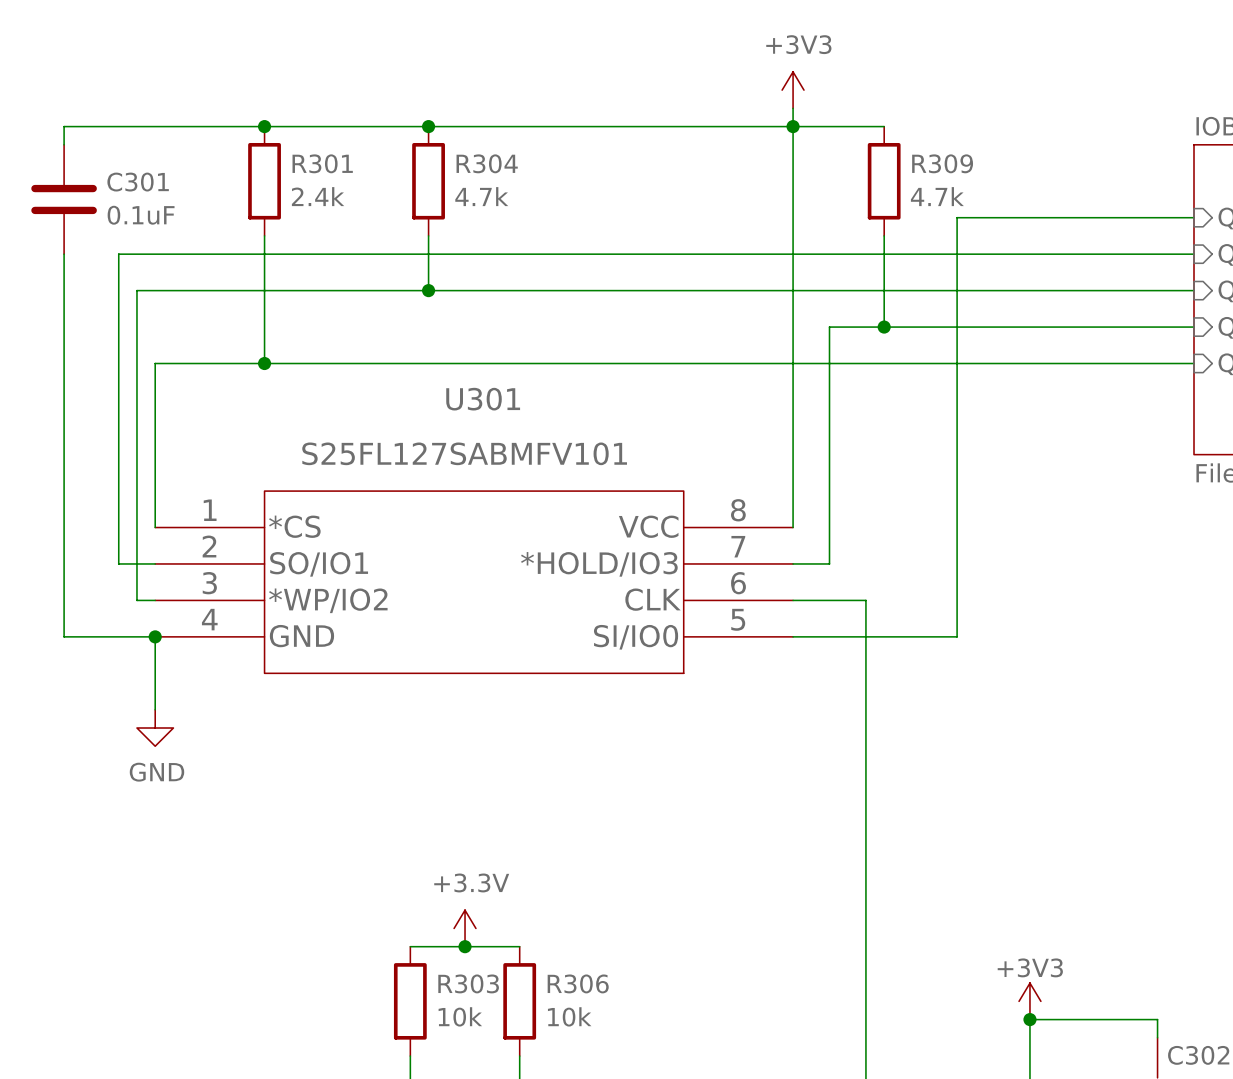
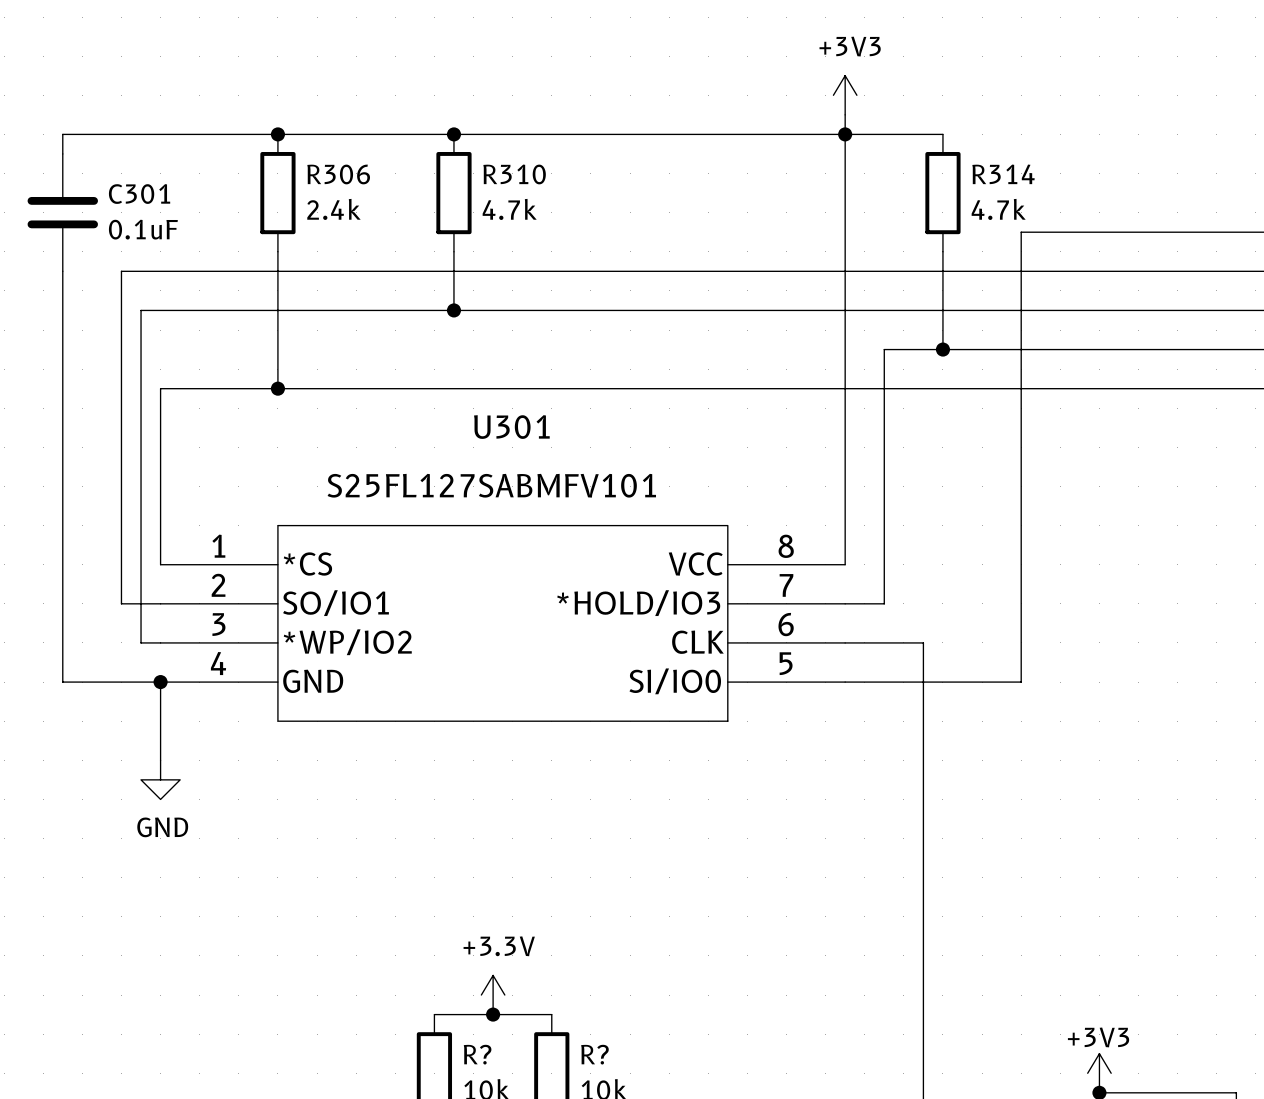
R301 name: R301 (322, 163) -> R306 (338, 174)
R304 name: R304 (487, 163) -> R310 (514, 174)
R309 name: R309 (942, 163) -> R314 (1003, 174)
R303 name: R303 (468, 983) -> R? (477, 1054)
R306 name: R306 (578, 983) -> R? (594, 1054)

